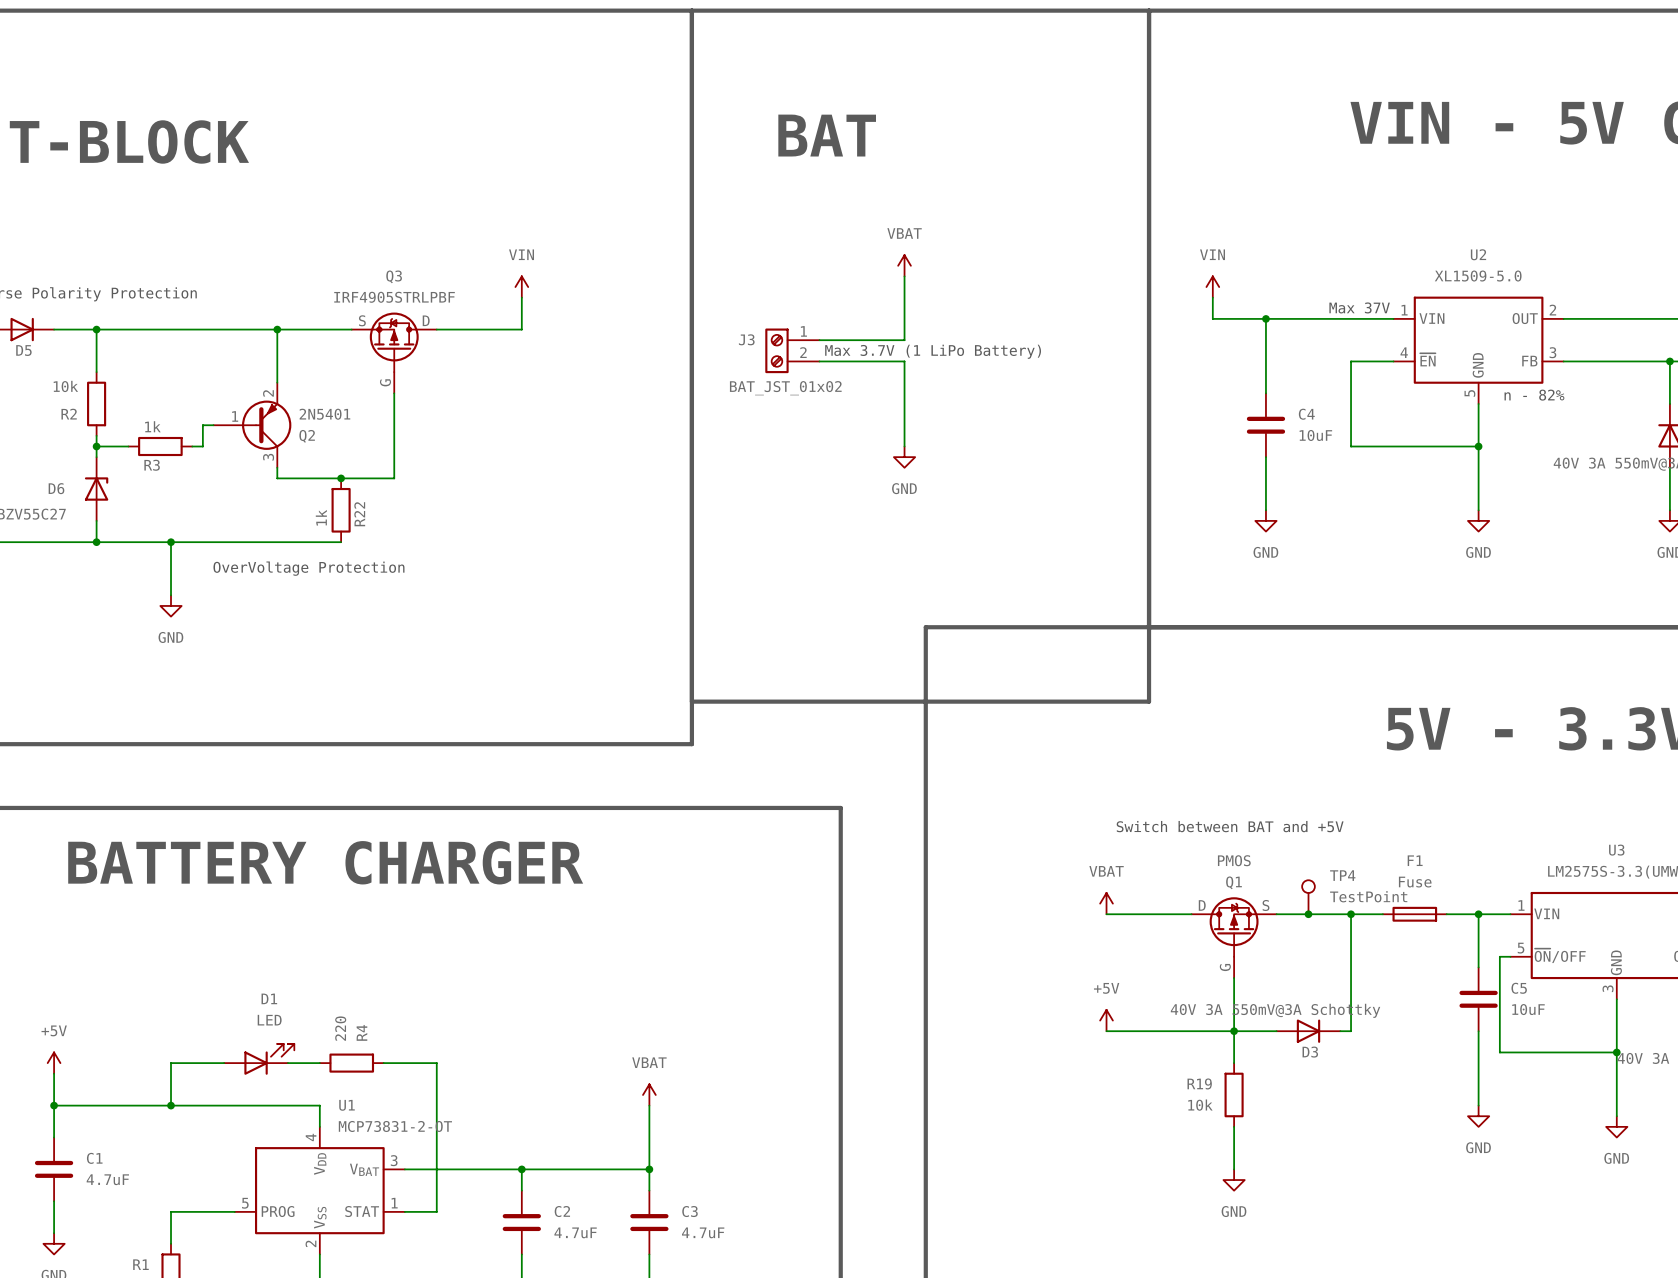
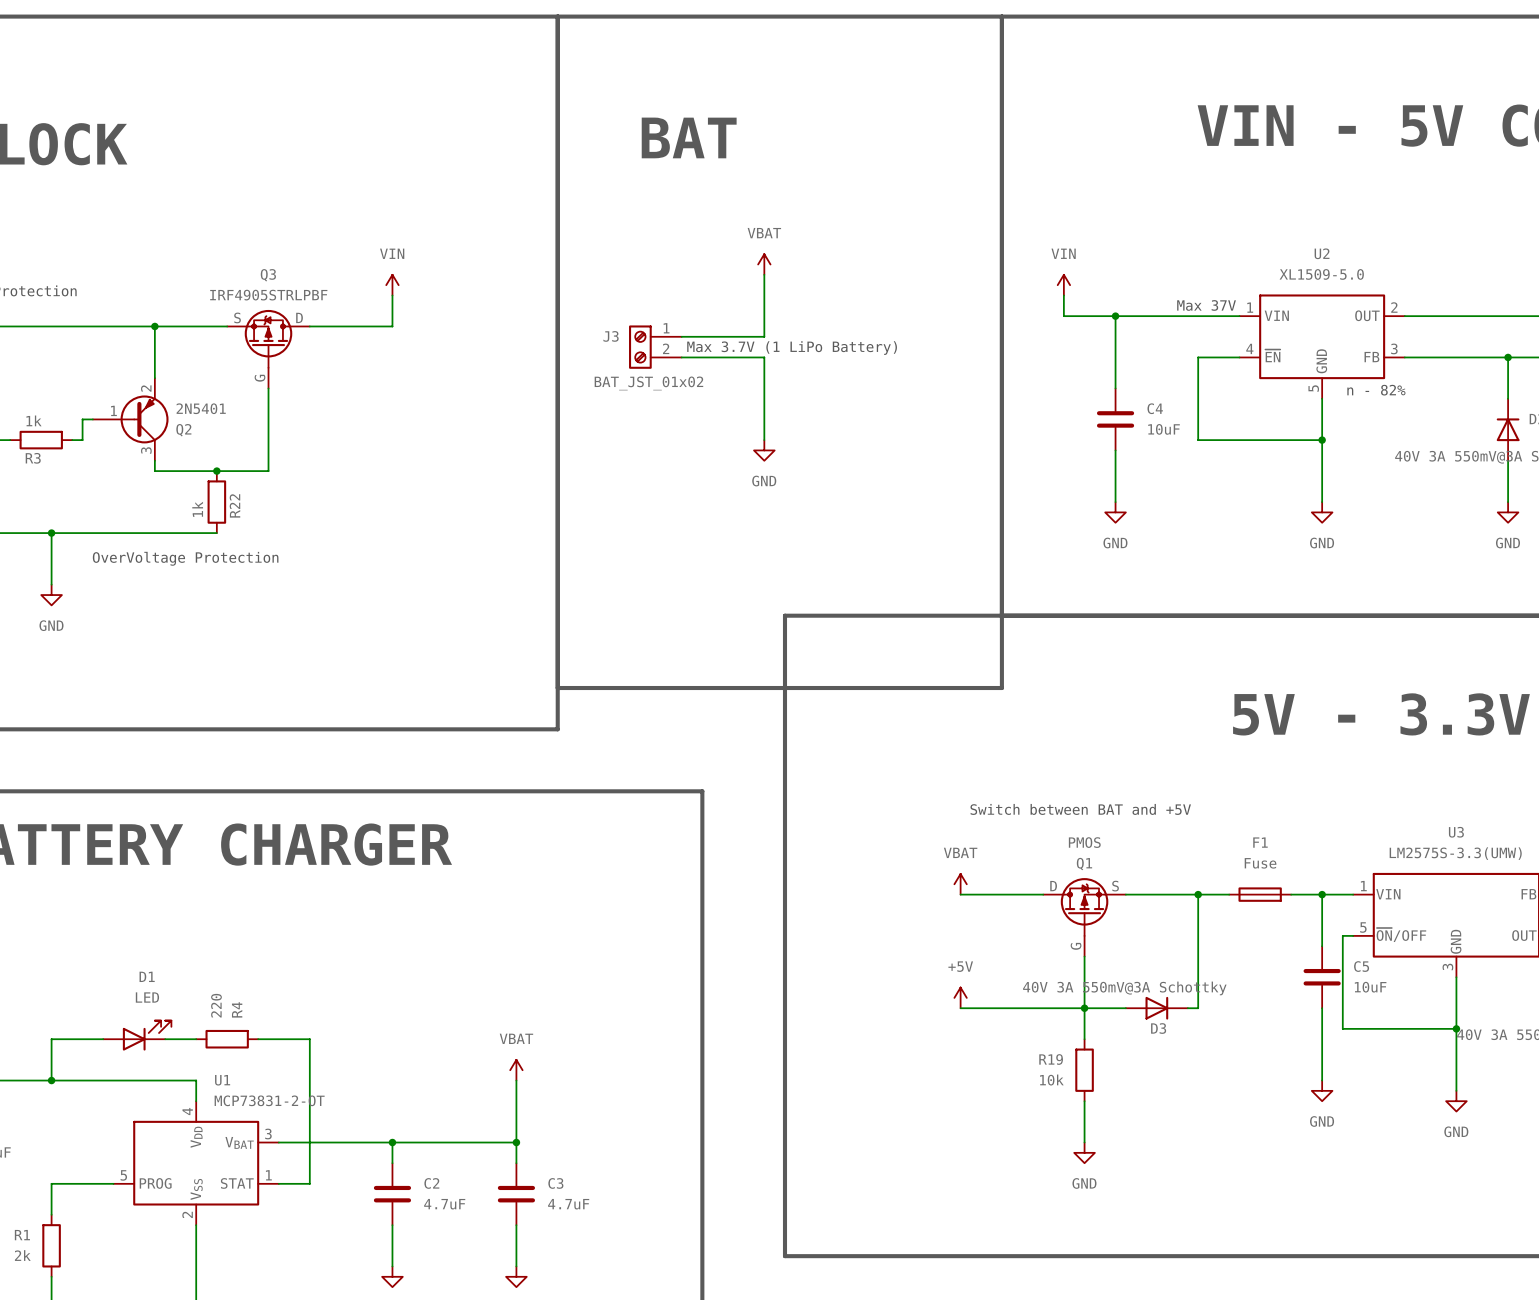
TP4: TestPoint (1308, 897) -> none
junction: (1308, 914) -> none

